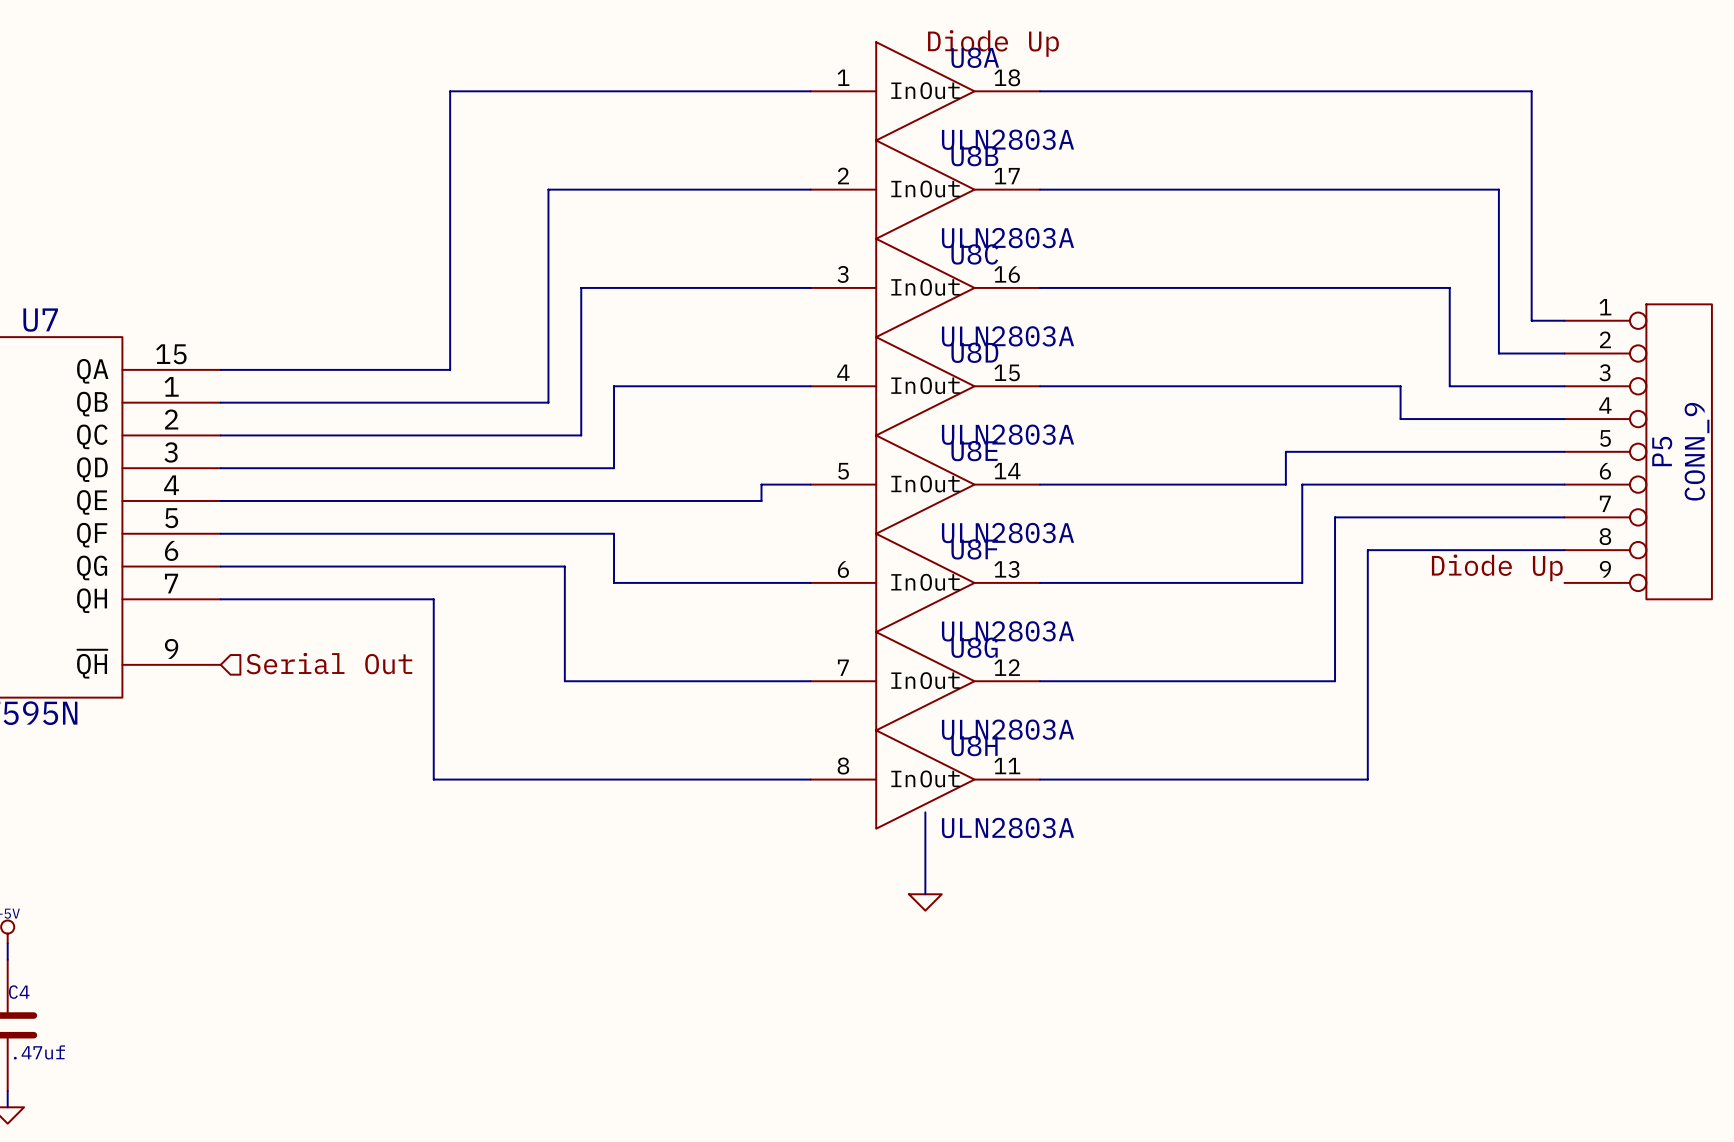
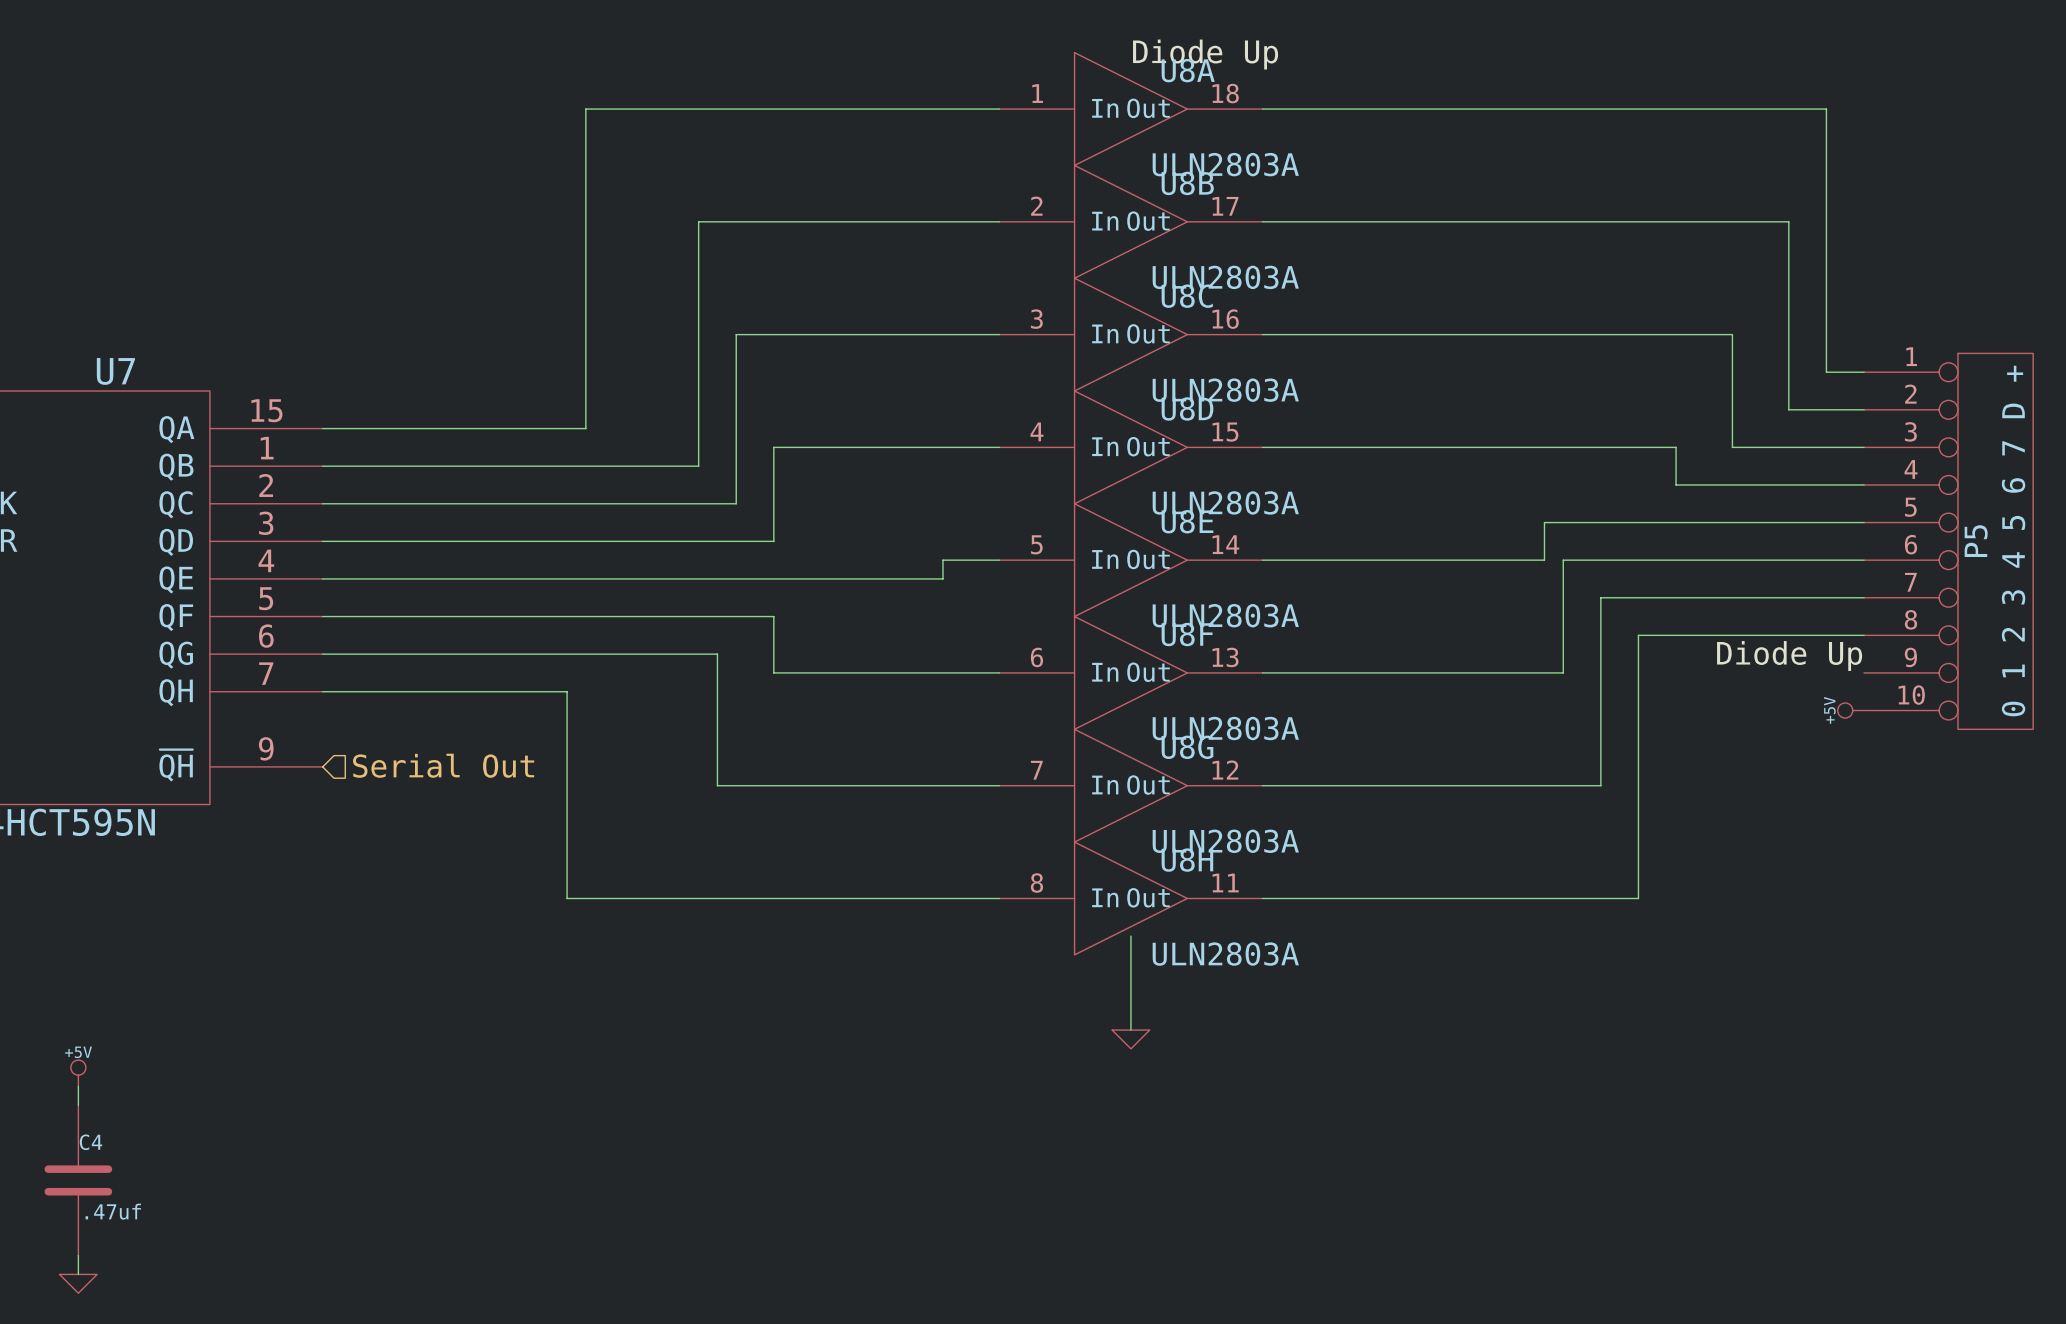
P5 symbol: [1564, 304, 1712, 600] -> [1864, 353, 2034, 730]
P5 value: CONN_9 (1697, 451) -> 0 1 2 3 4 5 6 7 D + (2013, 541)
power symbol: none -> +5V (1850, 710)

